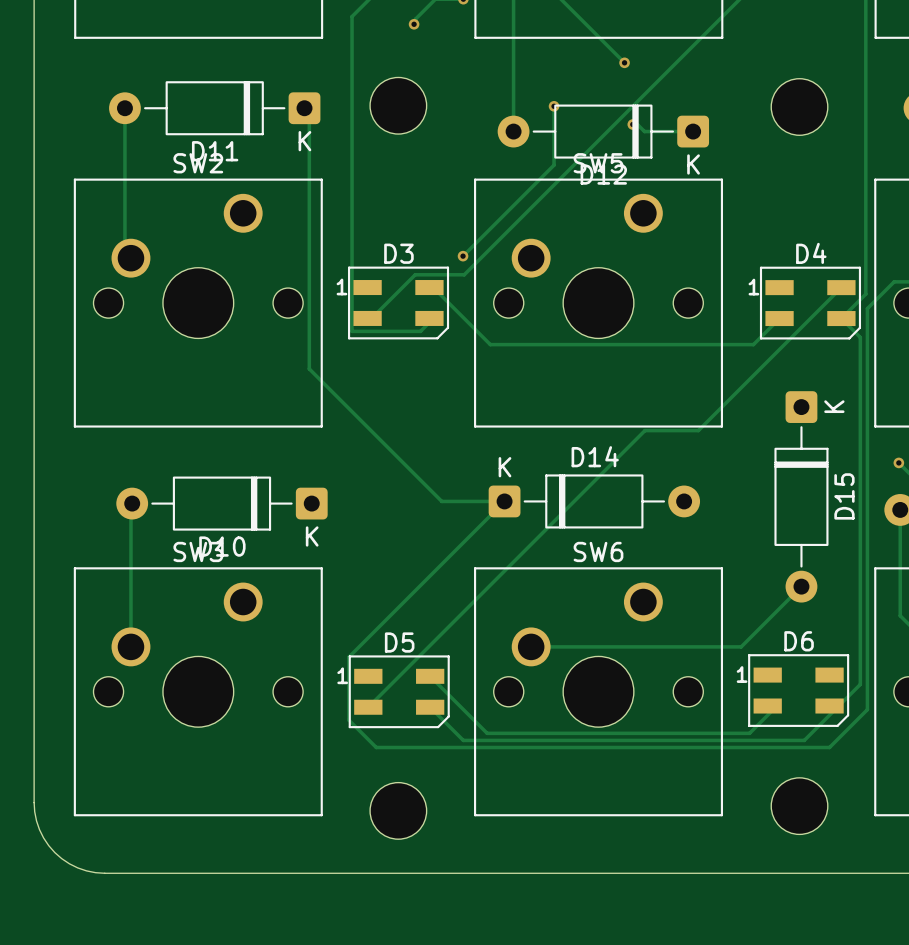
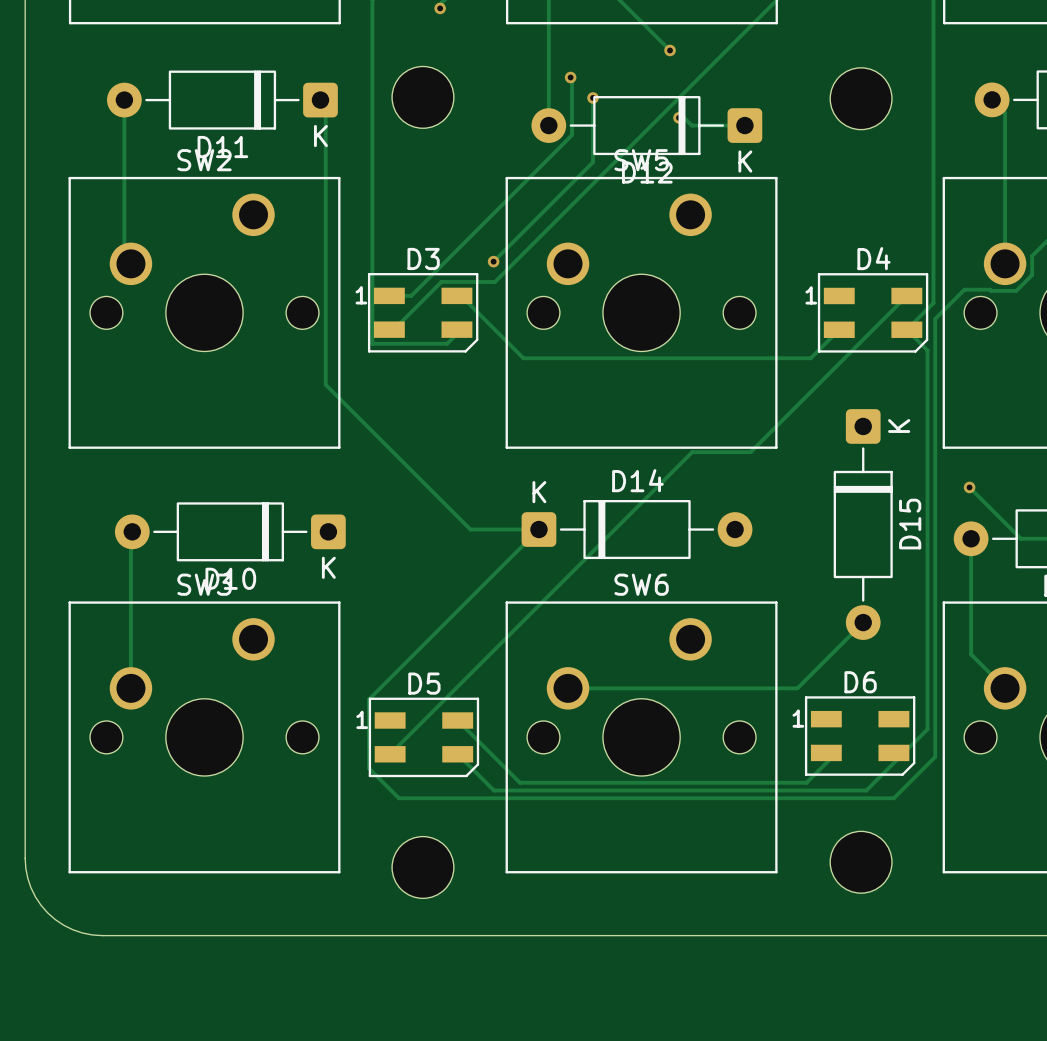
track: none -> (570, 77) (571, 135) (411, 295) (389, 295)
via: none -> (570, 77)

